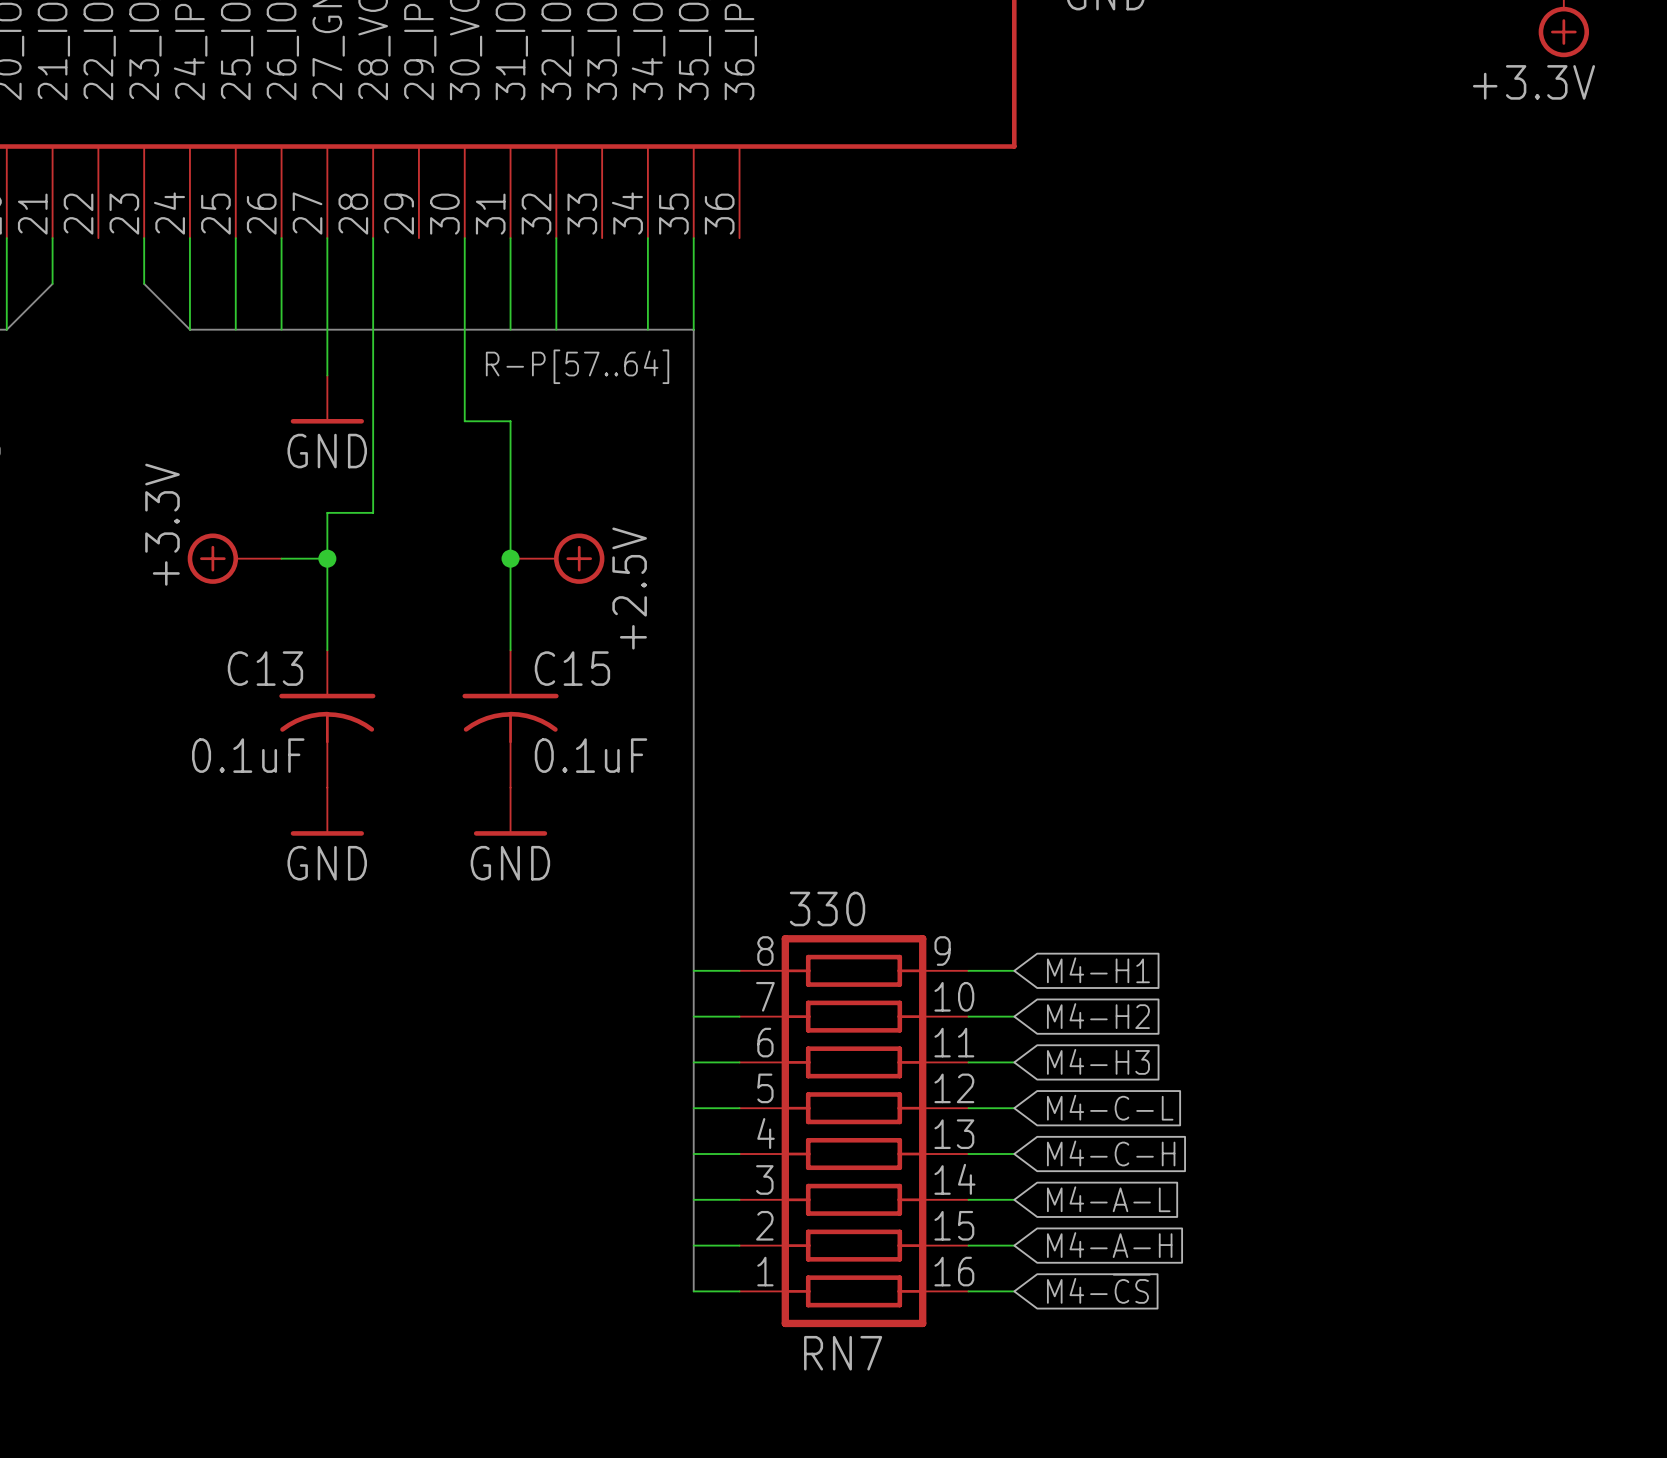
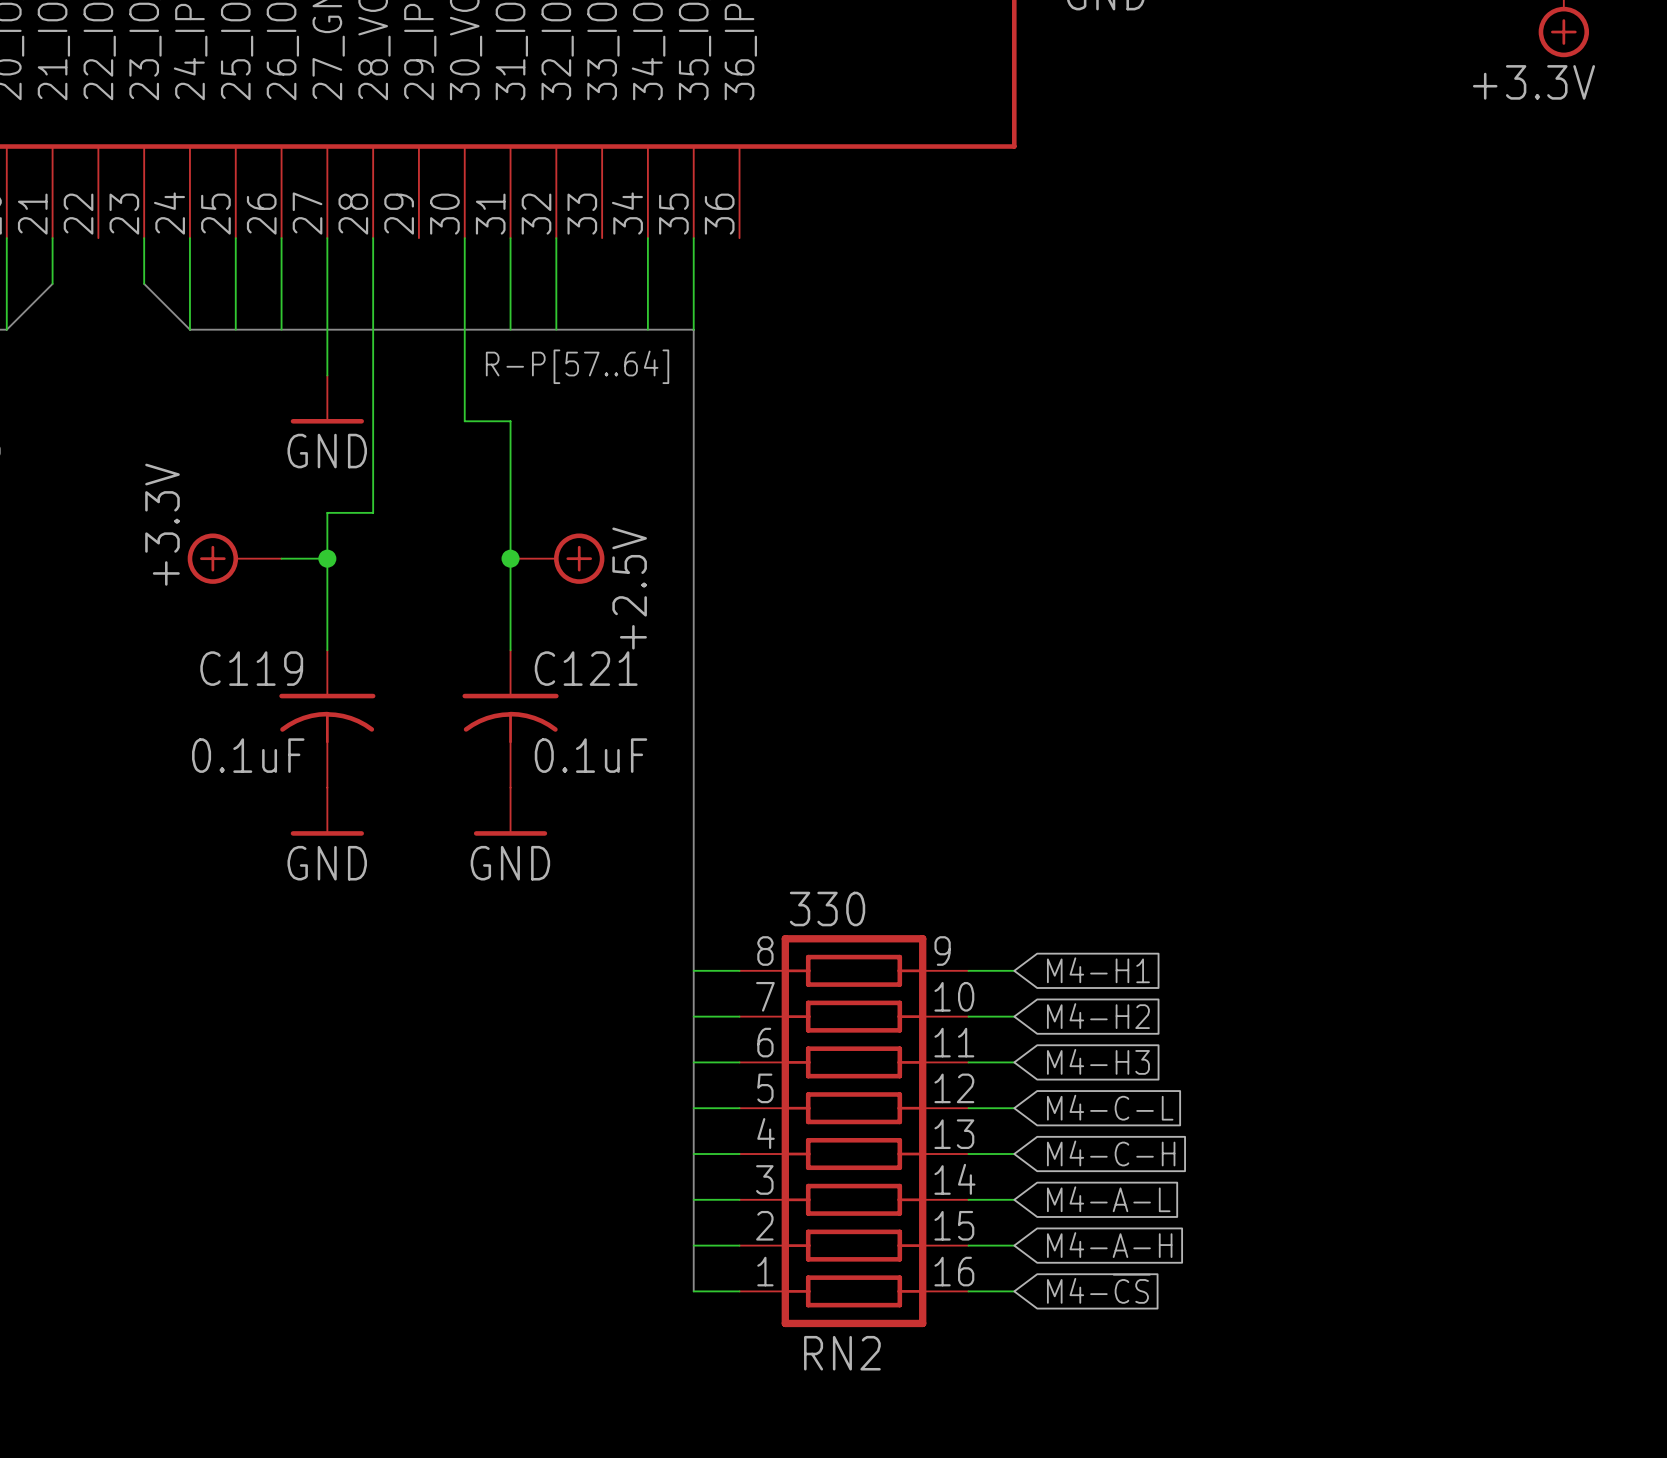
C13 name: C13 (265, 668) -> C119 (251, 668)
C15 name: C15 (572, 668) -> C121 (586, 668)
RN7 name: RN7 (843, 1353) -> RN2 (842, 1353)

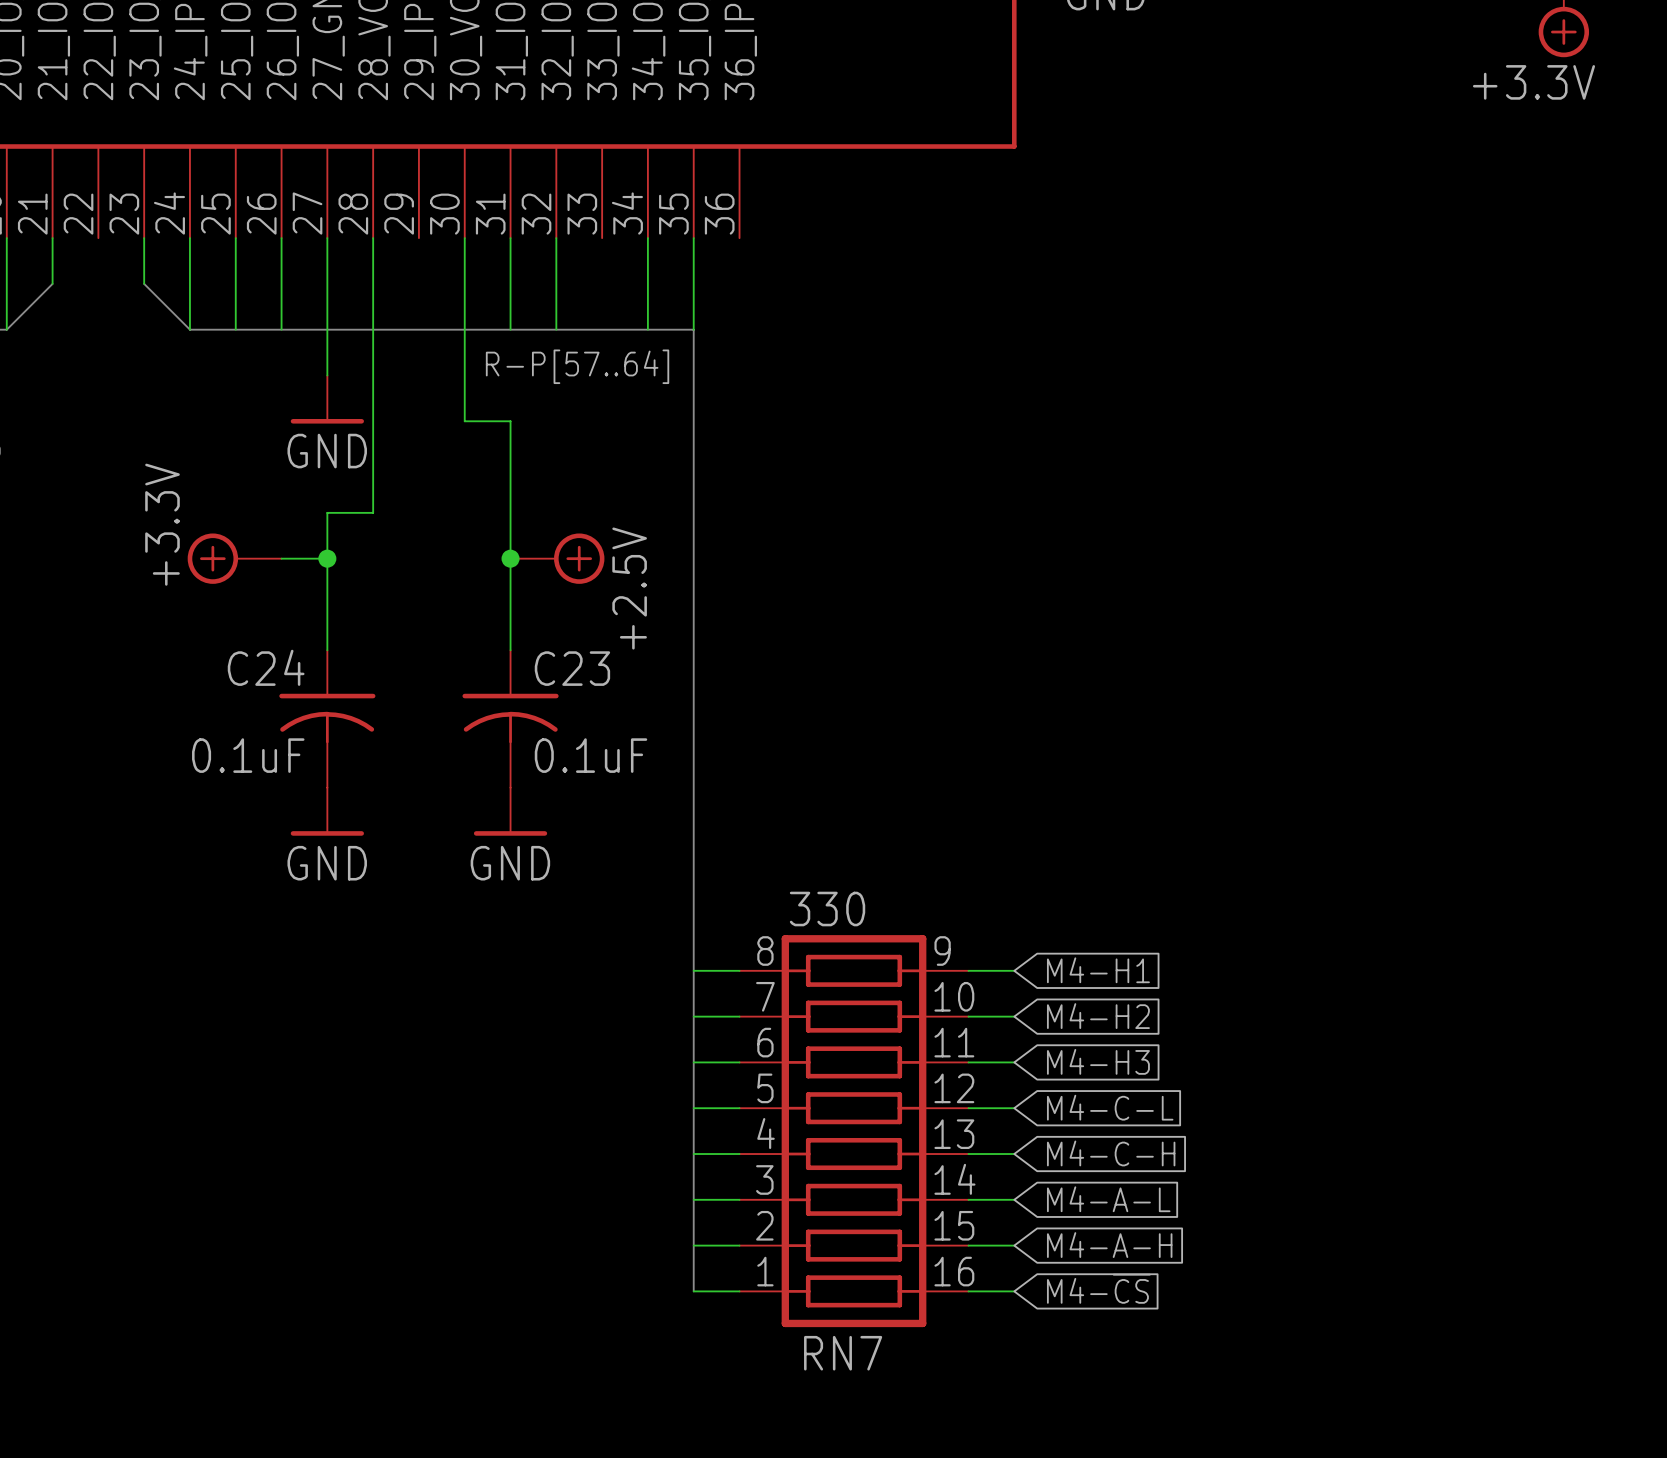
C119 name: C119 (251, 668) -> C24 (266, 667)
C121 name: C121 (586, 668) -> C23 (572, 668)
RN2 name: RN2 (842, 1353) -> RN7 (843, 1353)

